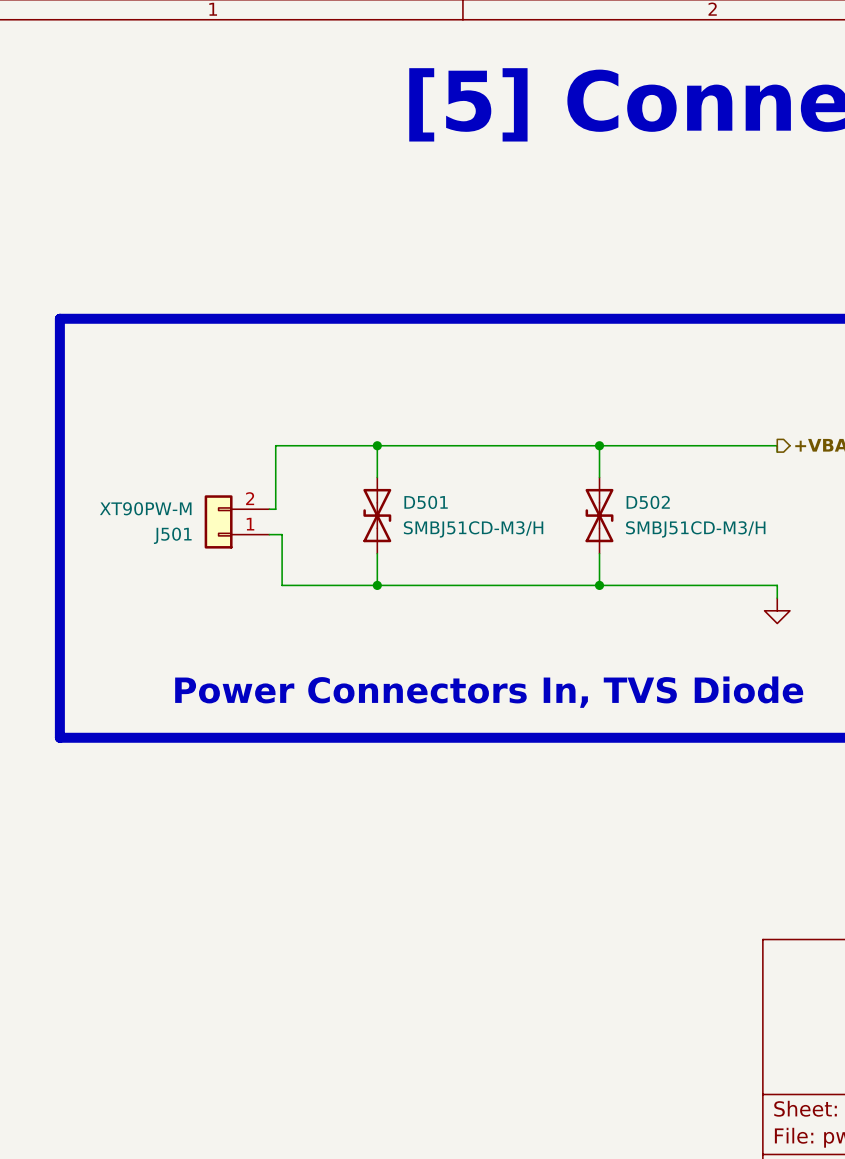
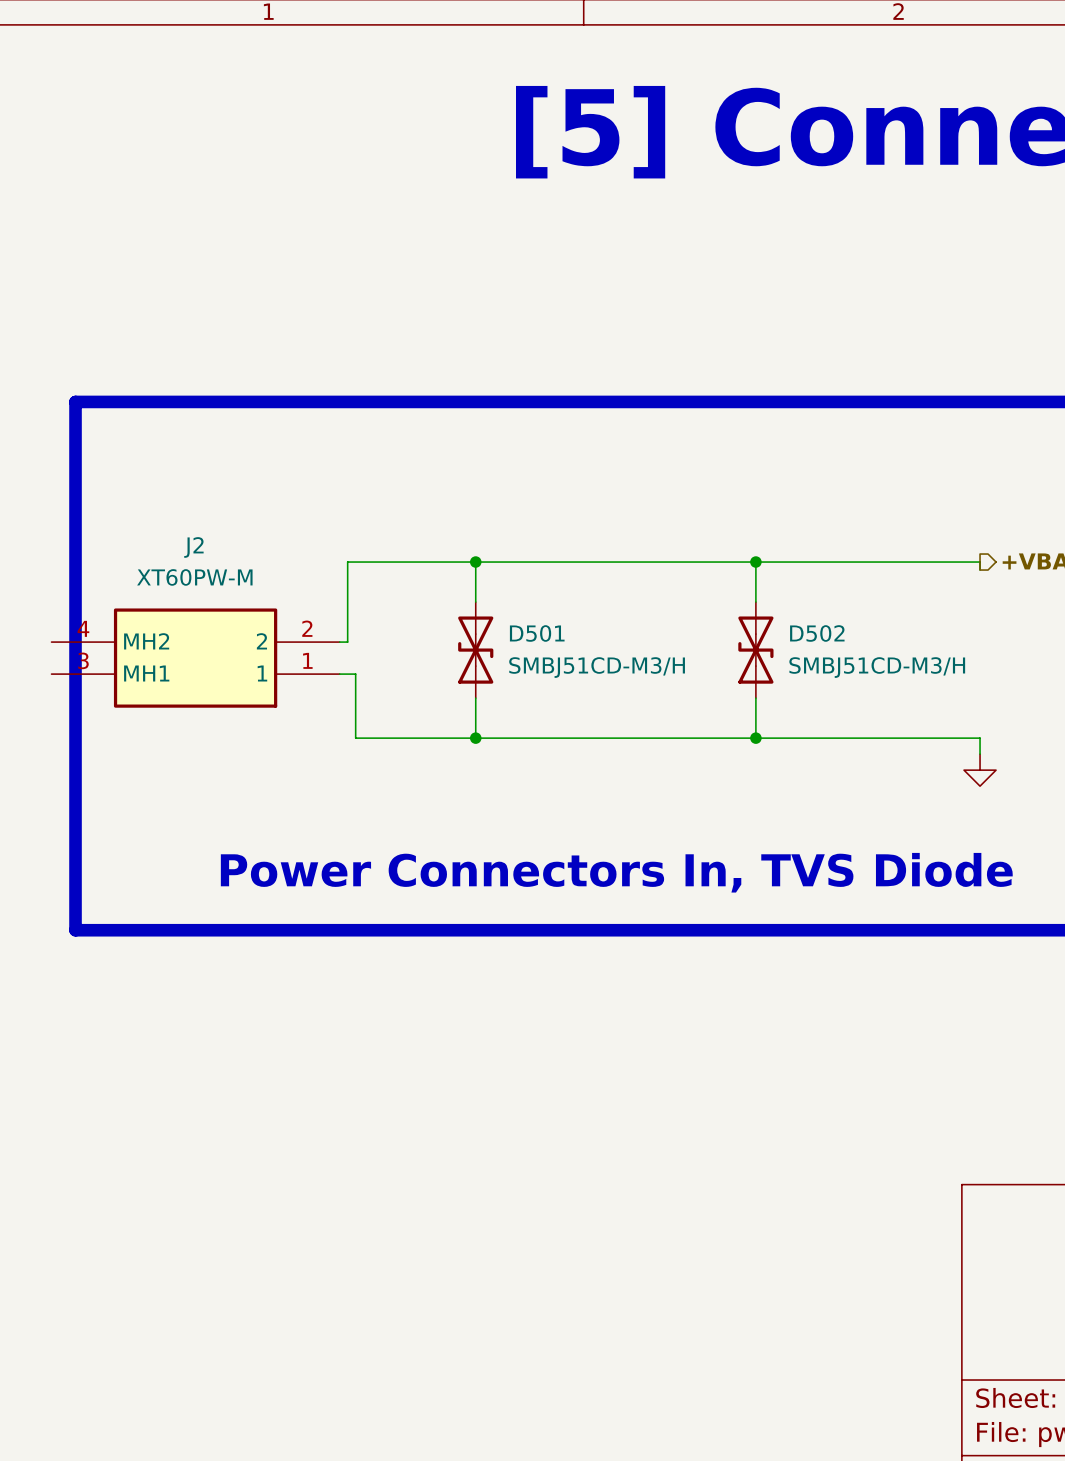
J2: none -> XT60PW-M (195, 658)
J501: XT90PW-M (237, 521) -> none

